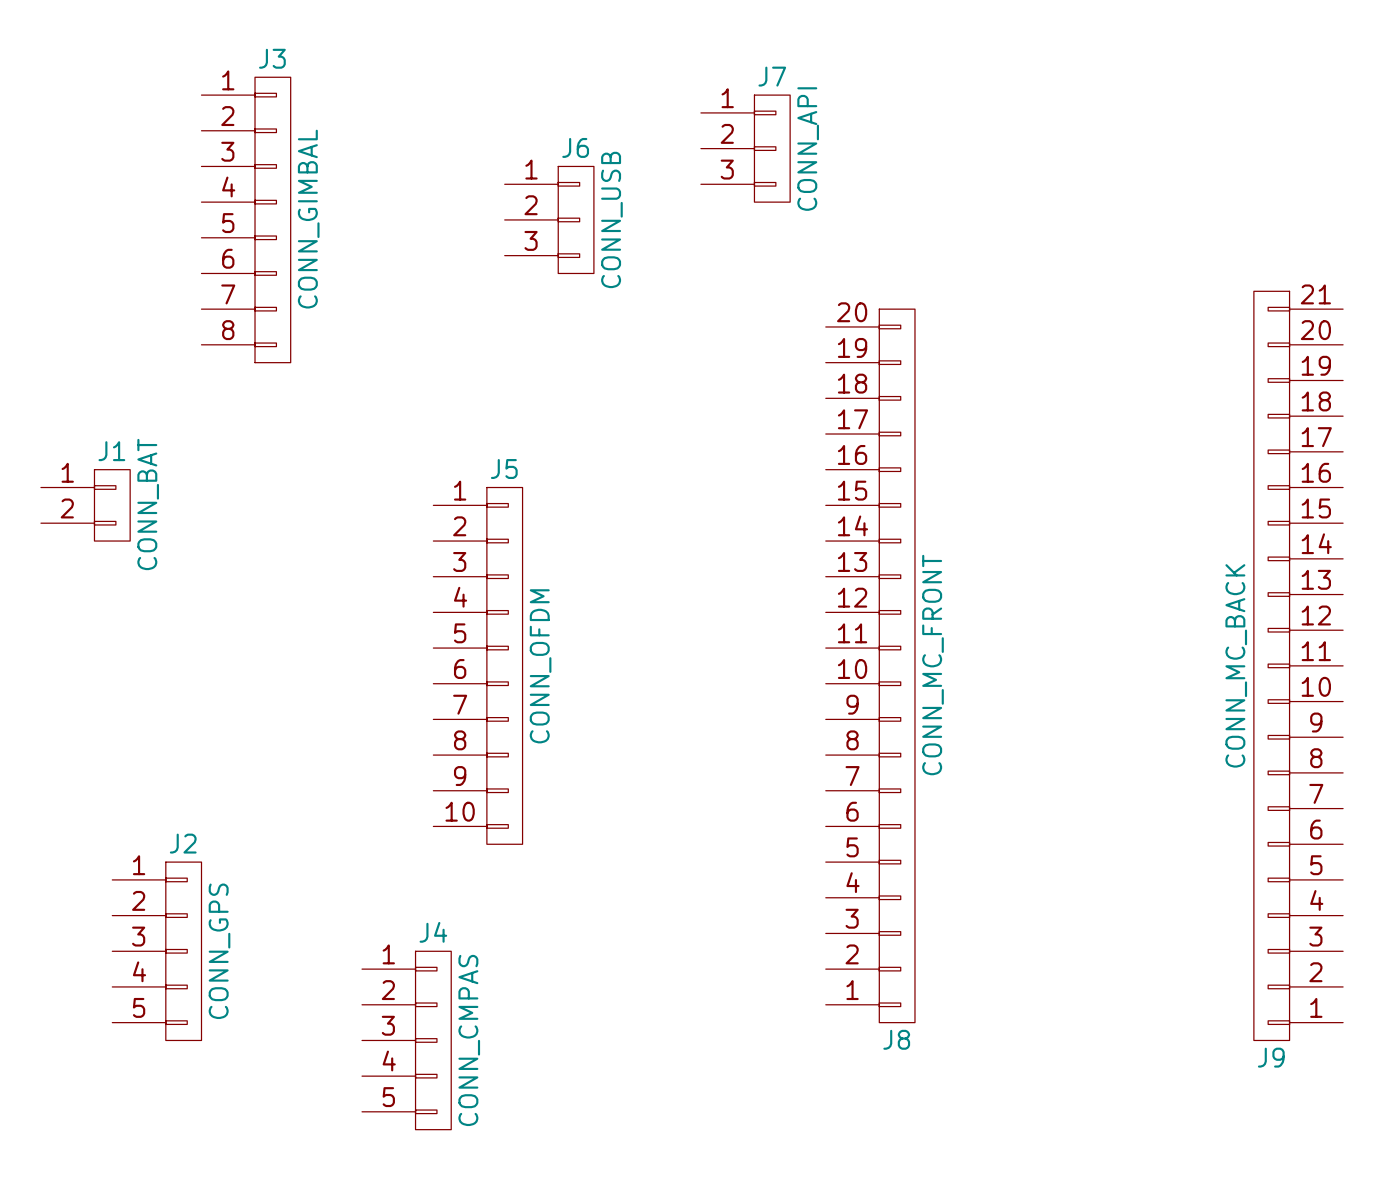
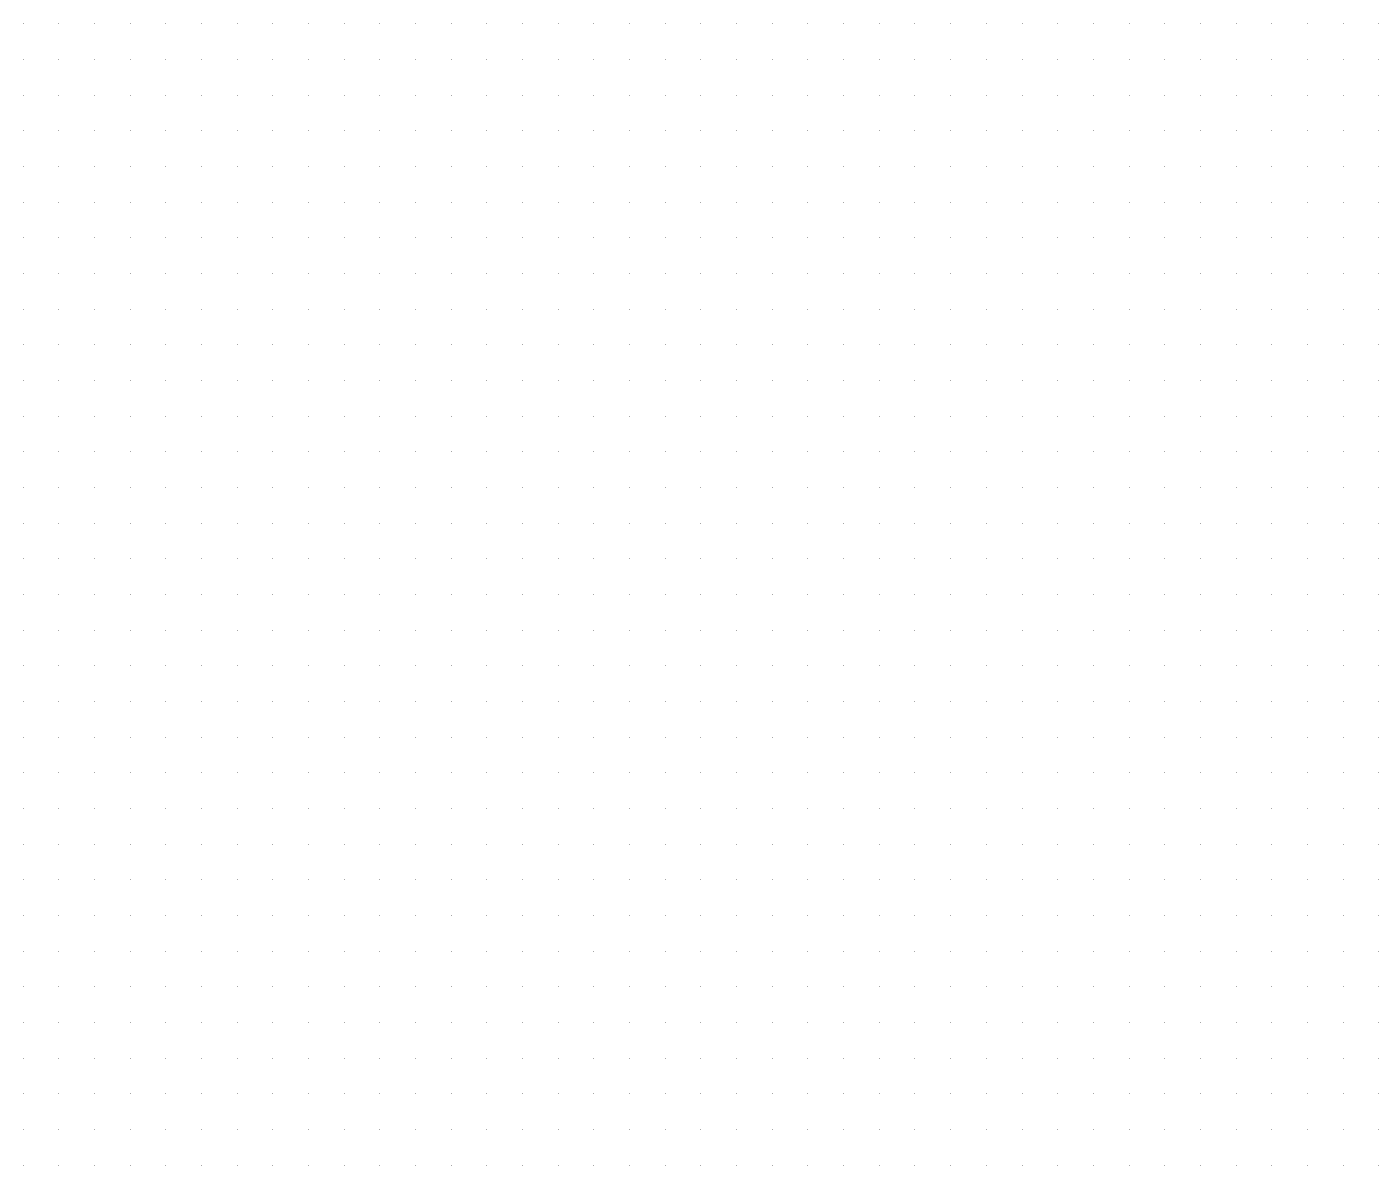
J7: CONN_API (745, 148) -> none
J3: CONN_GIMBAL (246, 219) -> none
J6: CONN_USB (549, 219) -> none
J1: CONN_BAT (85, 505) -> none
J5: CONN_OFDM (477, 665) -> none
J8: CONN_MC_FRONT (870, 665) -> none
J9: CONN_MC_BACK (1298, 665) -> none
J2: CONN_GPS (156, 951) -> none
J4: CONN_CMPAS (406, 1040) -> none

